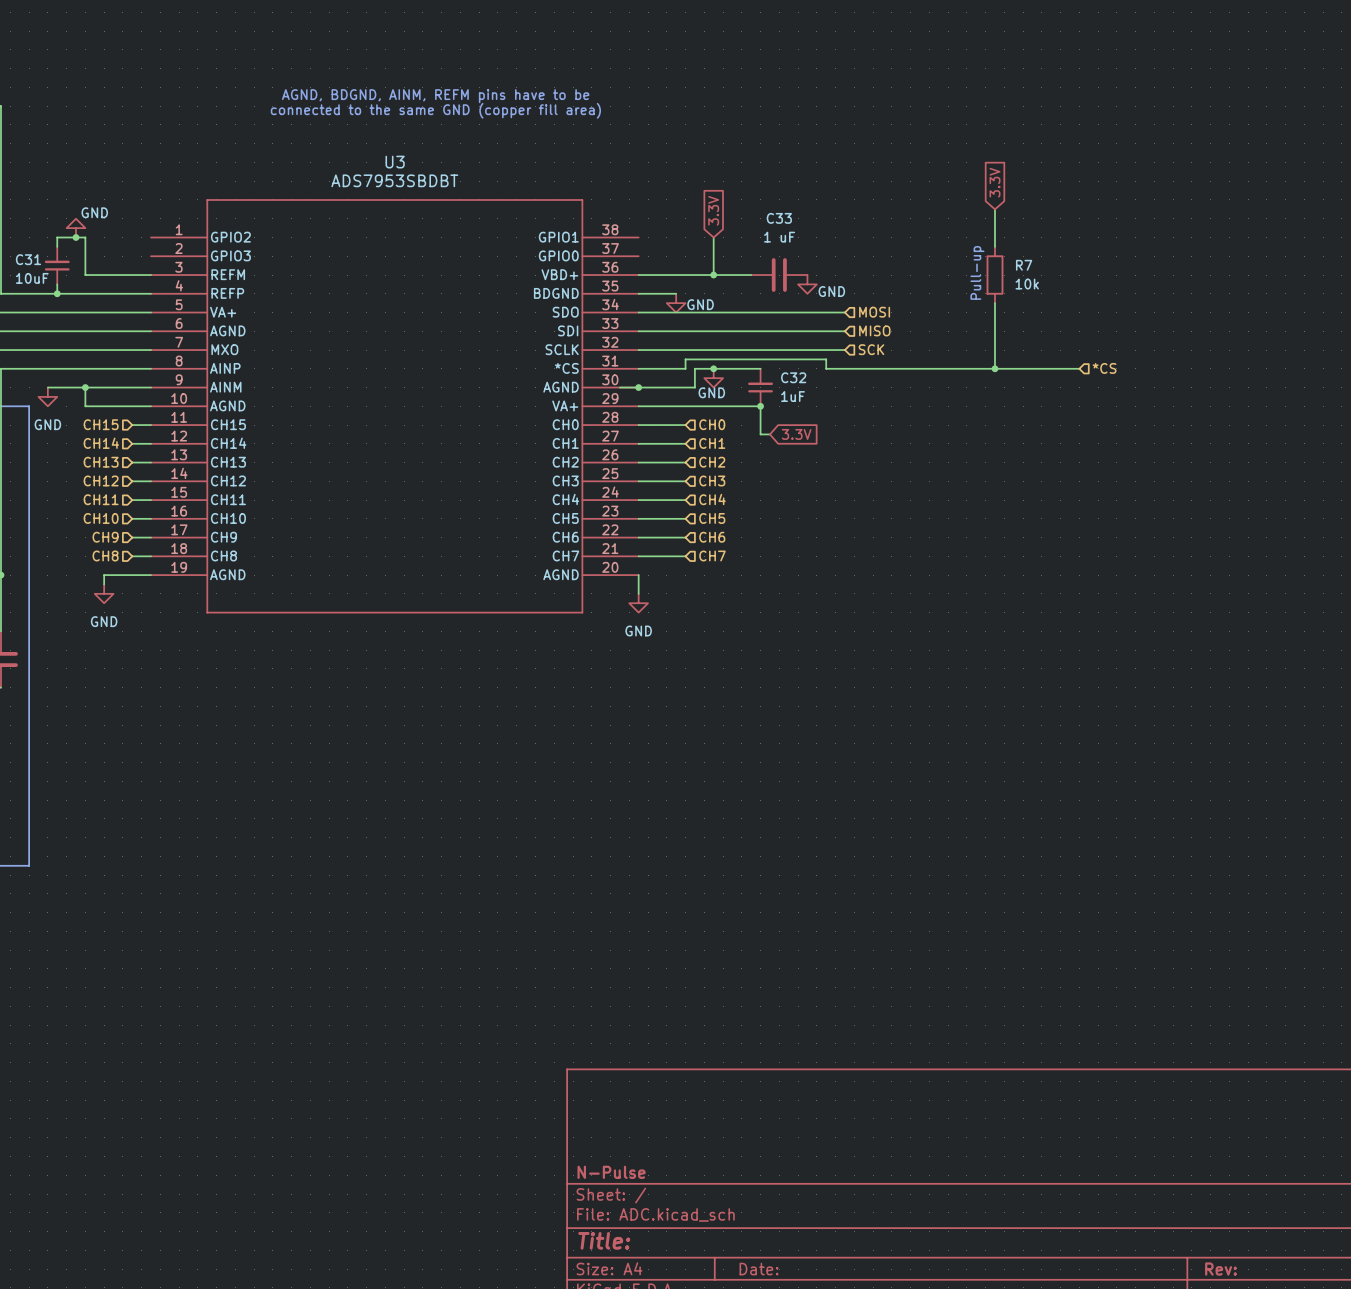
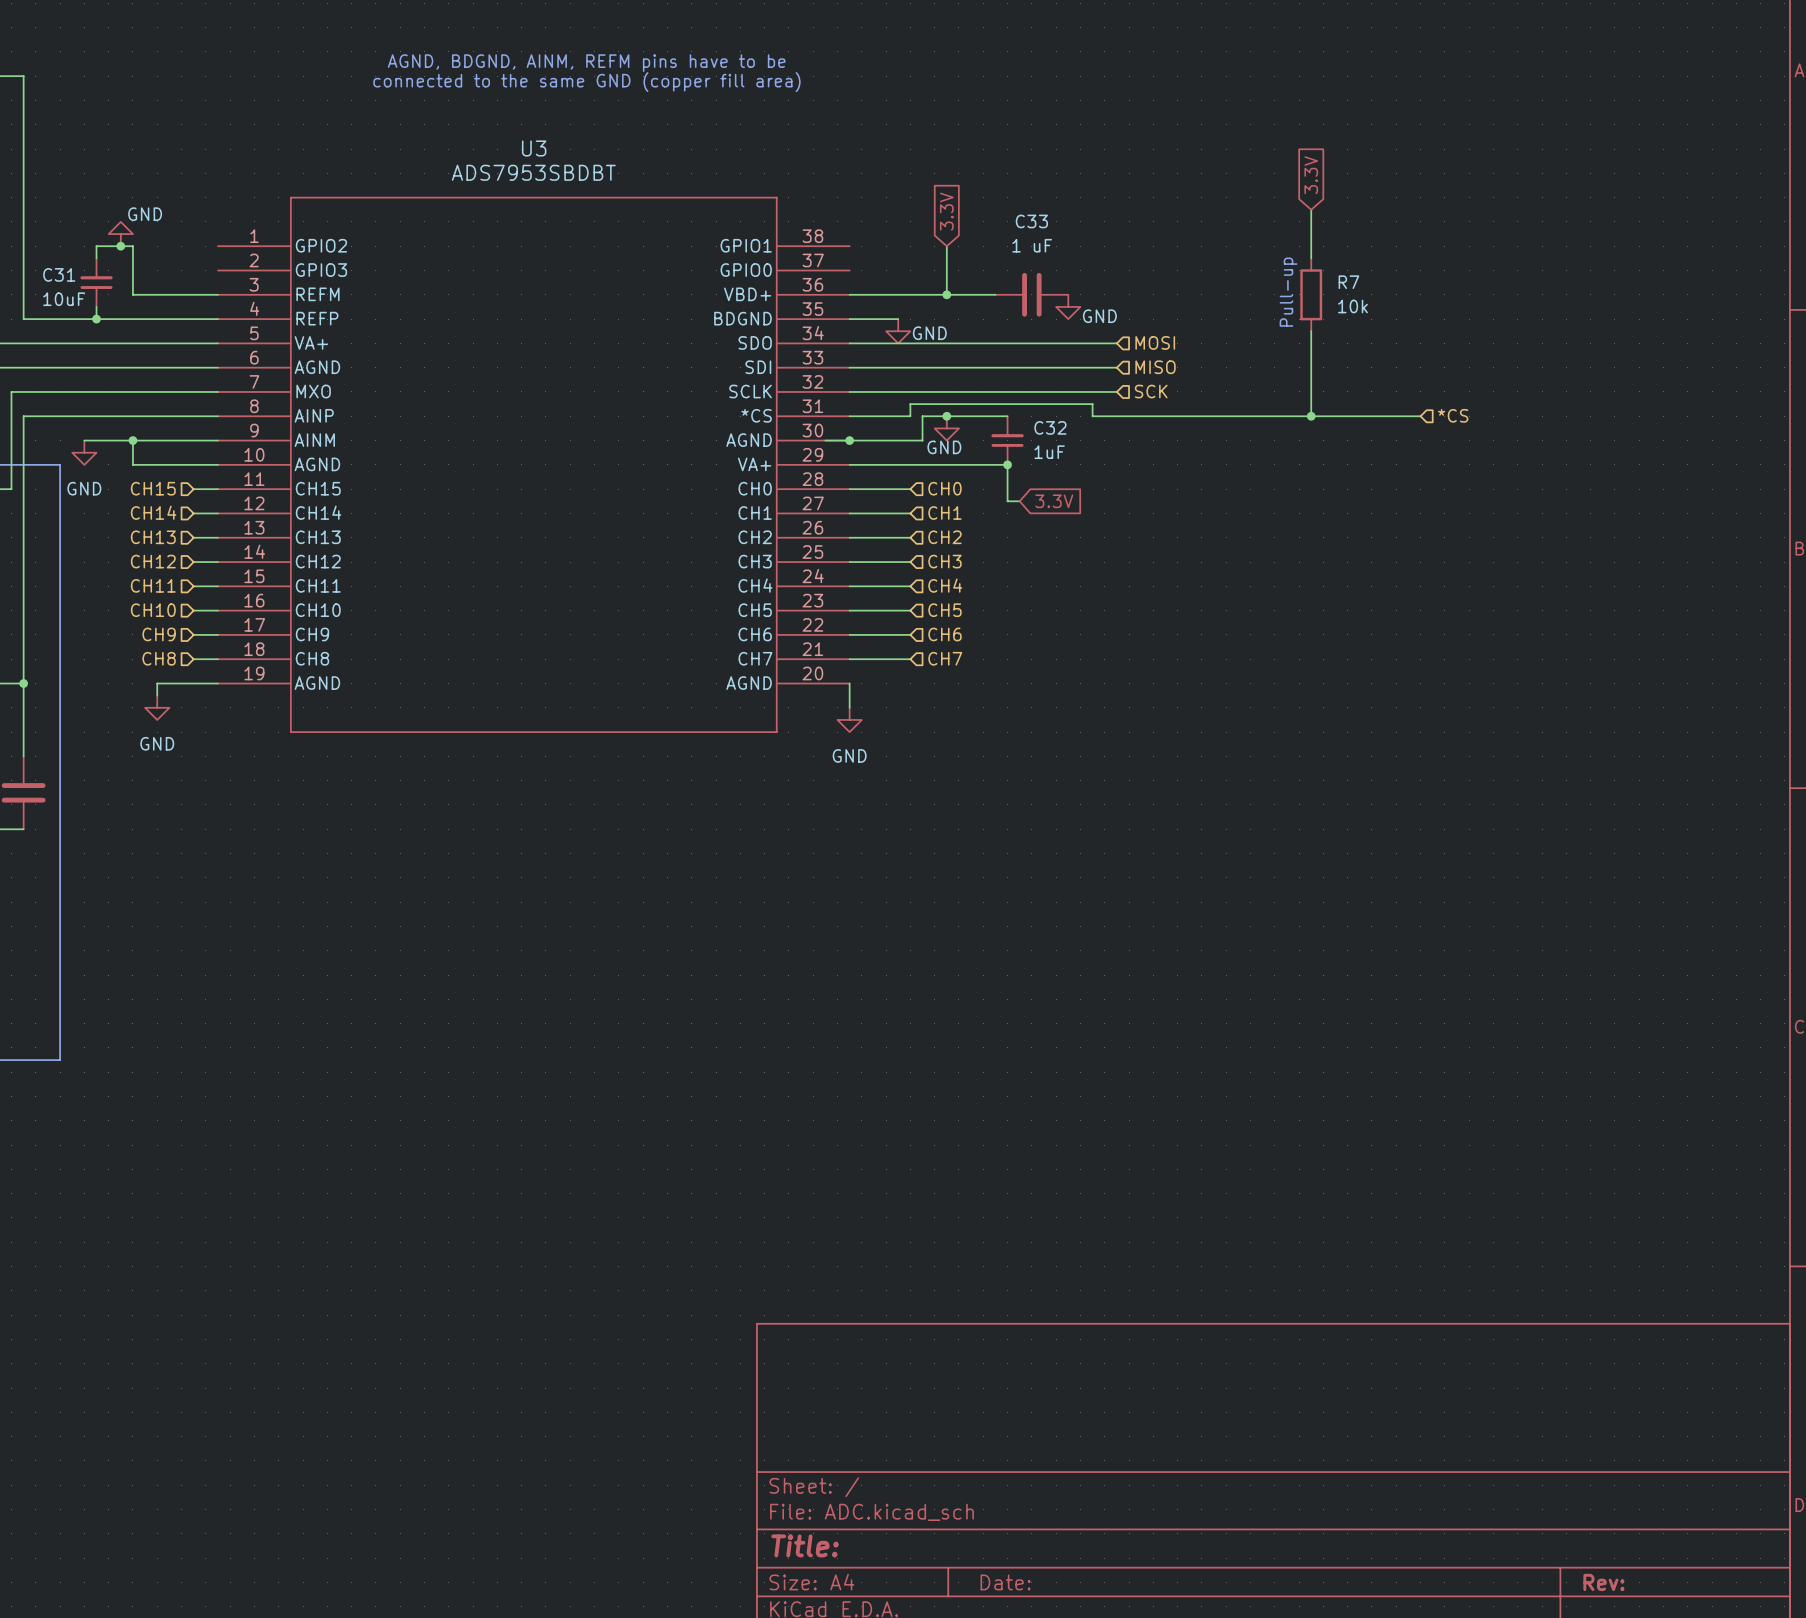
title block: N-Pulse (611, 1172) -> none

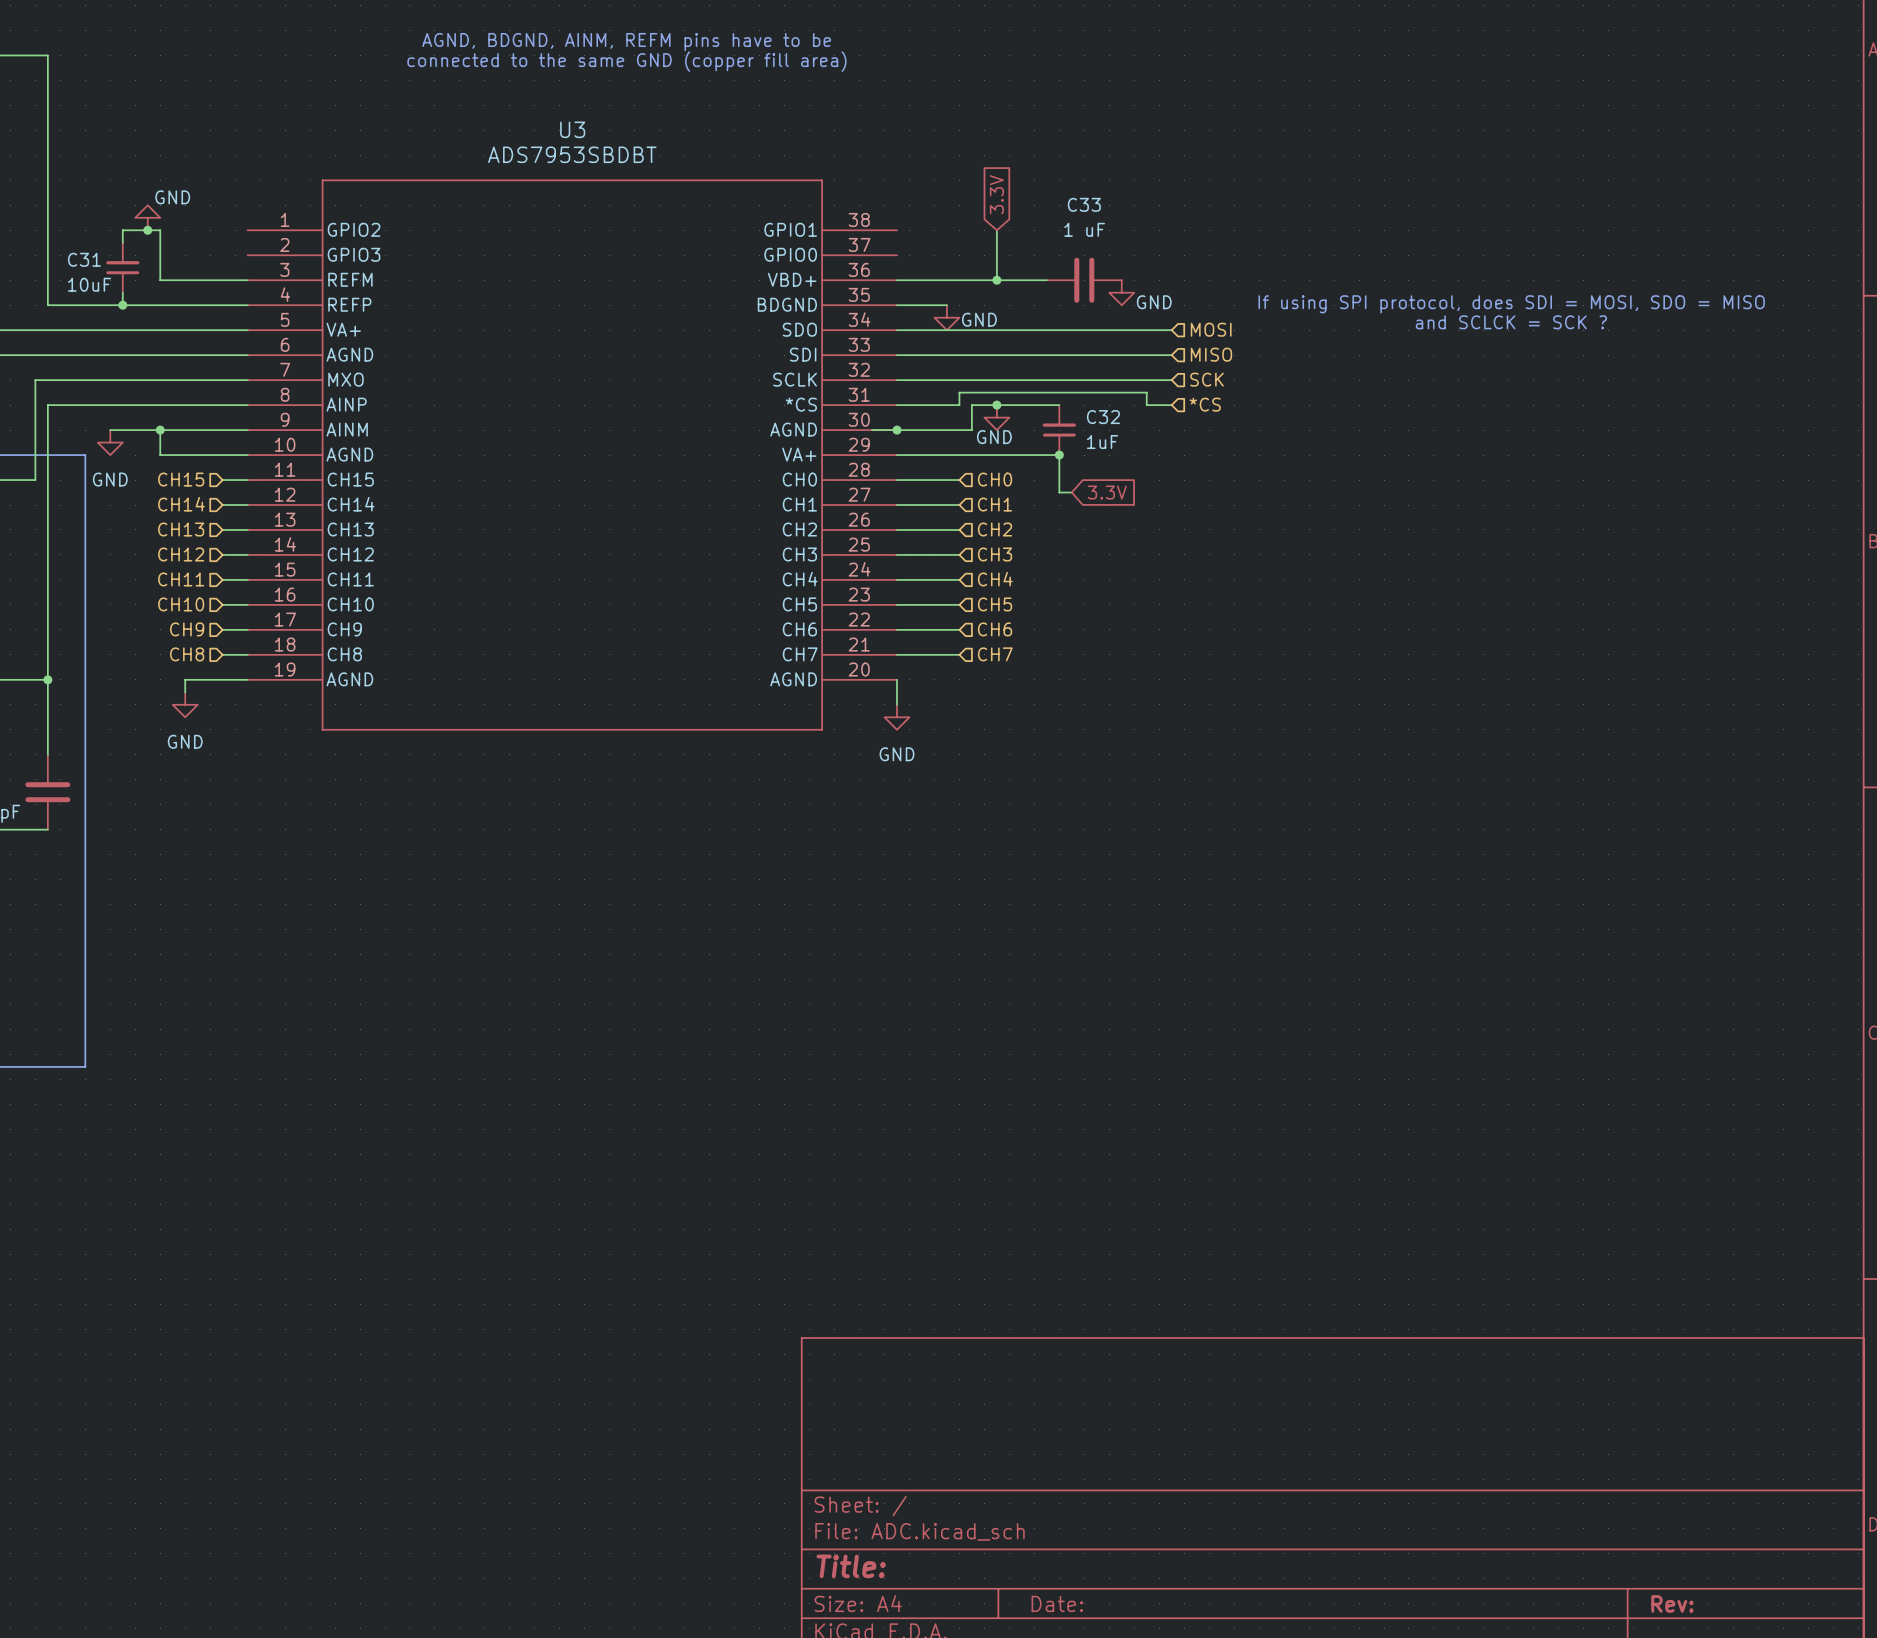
global label: 3.3V (1311, 175) -> none
wire: (1311, 209) (1311, 258) -> none
text: Pull-up (1288, 292) -> none
R7: 10k (1311, 294) -> none
text: none -> If using SPI protocol, does SDI = MOSI, SDO = MISO (1511, 304)
wire: (1311, 331) (1311, 416) -> none
text: none -> and SCLCK = SCK ? (1511, 322)
hierarchical label: none -> *CS (1205, 404)
hierarchical label: *CS (1453, 415) -> none
wire: (1116, 416) (1420, 416) -> none
junction: (1311, 416) -> none

